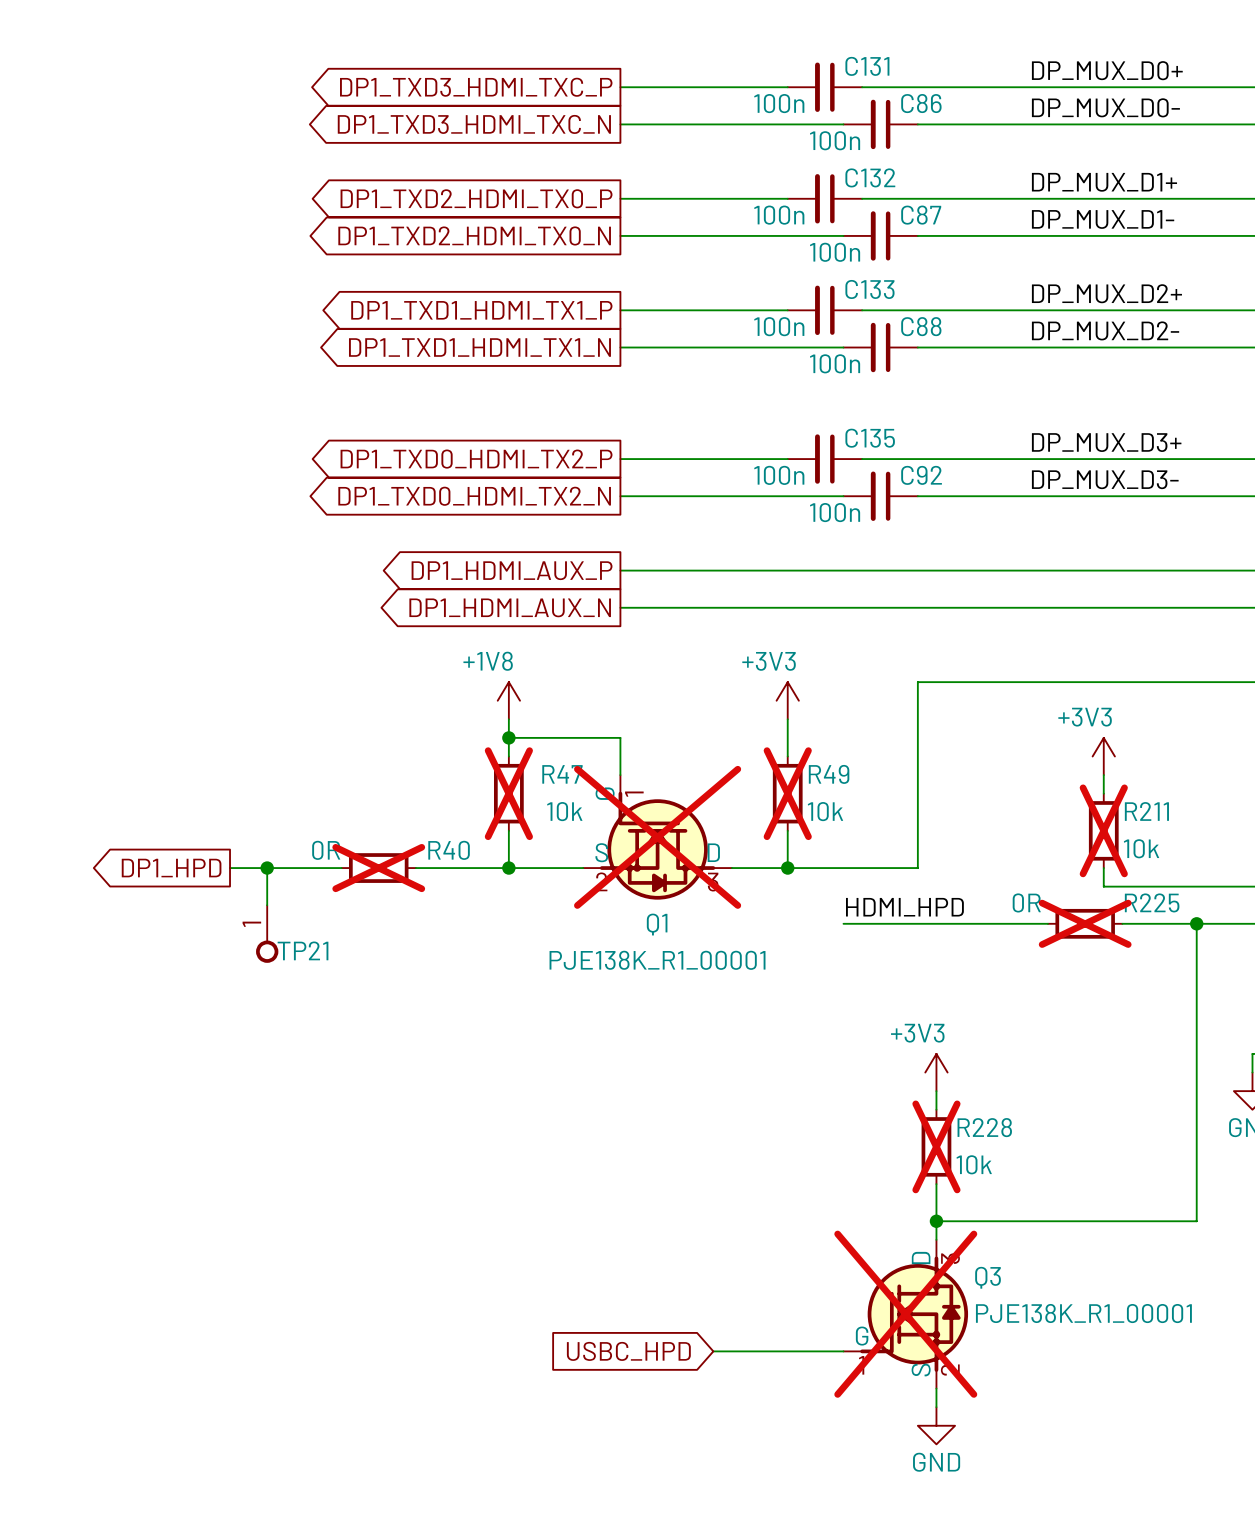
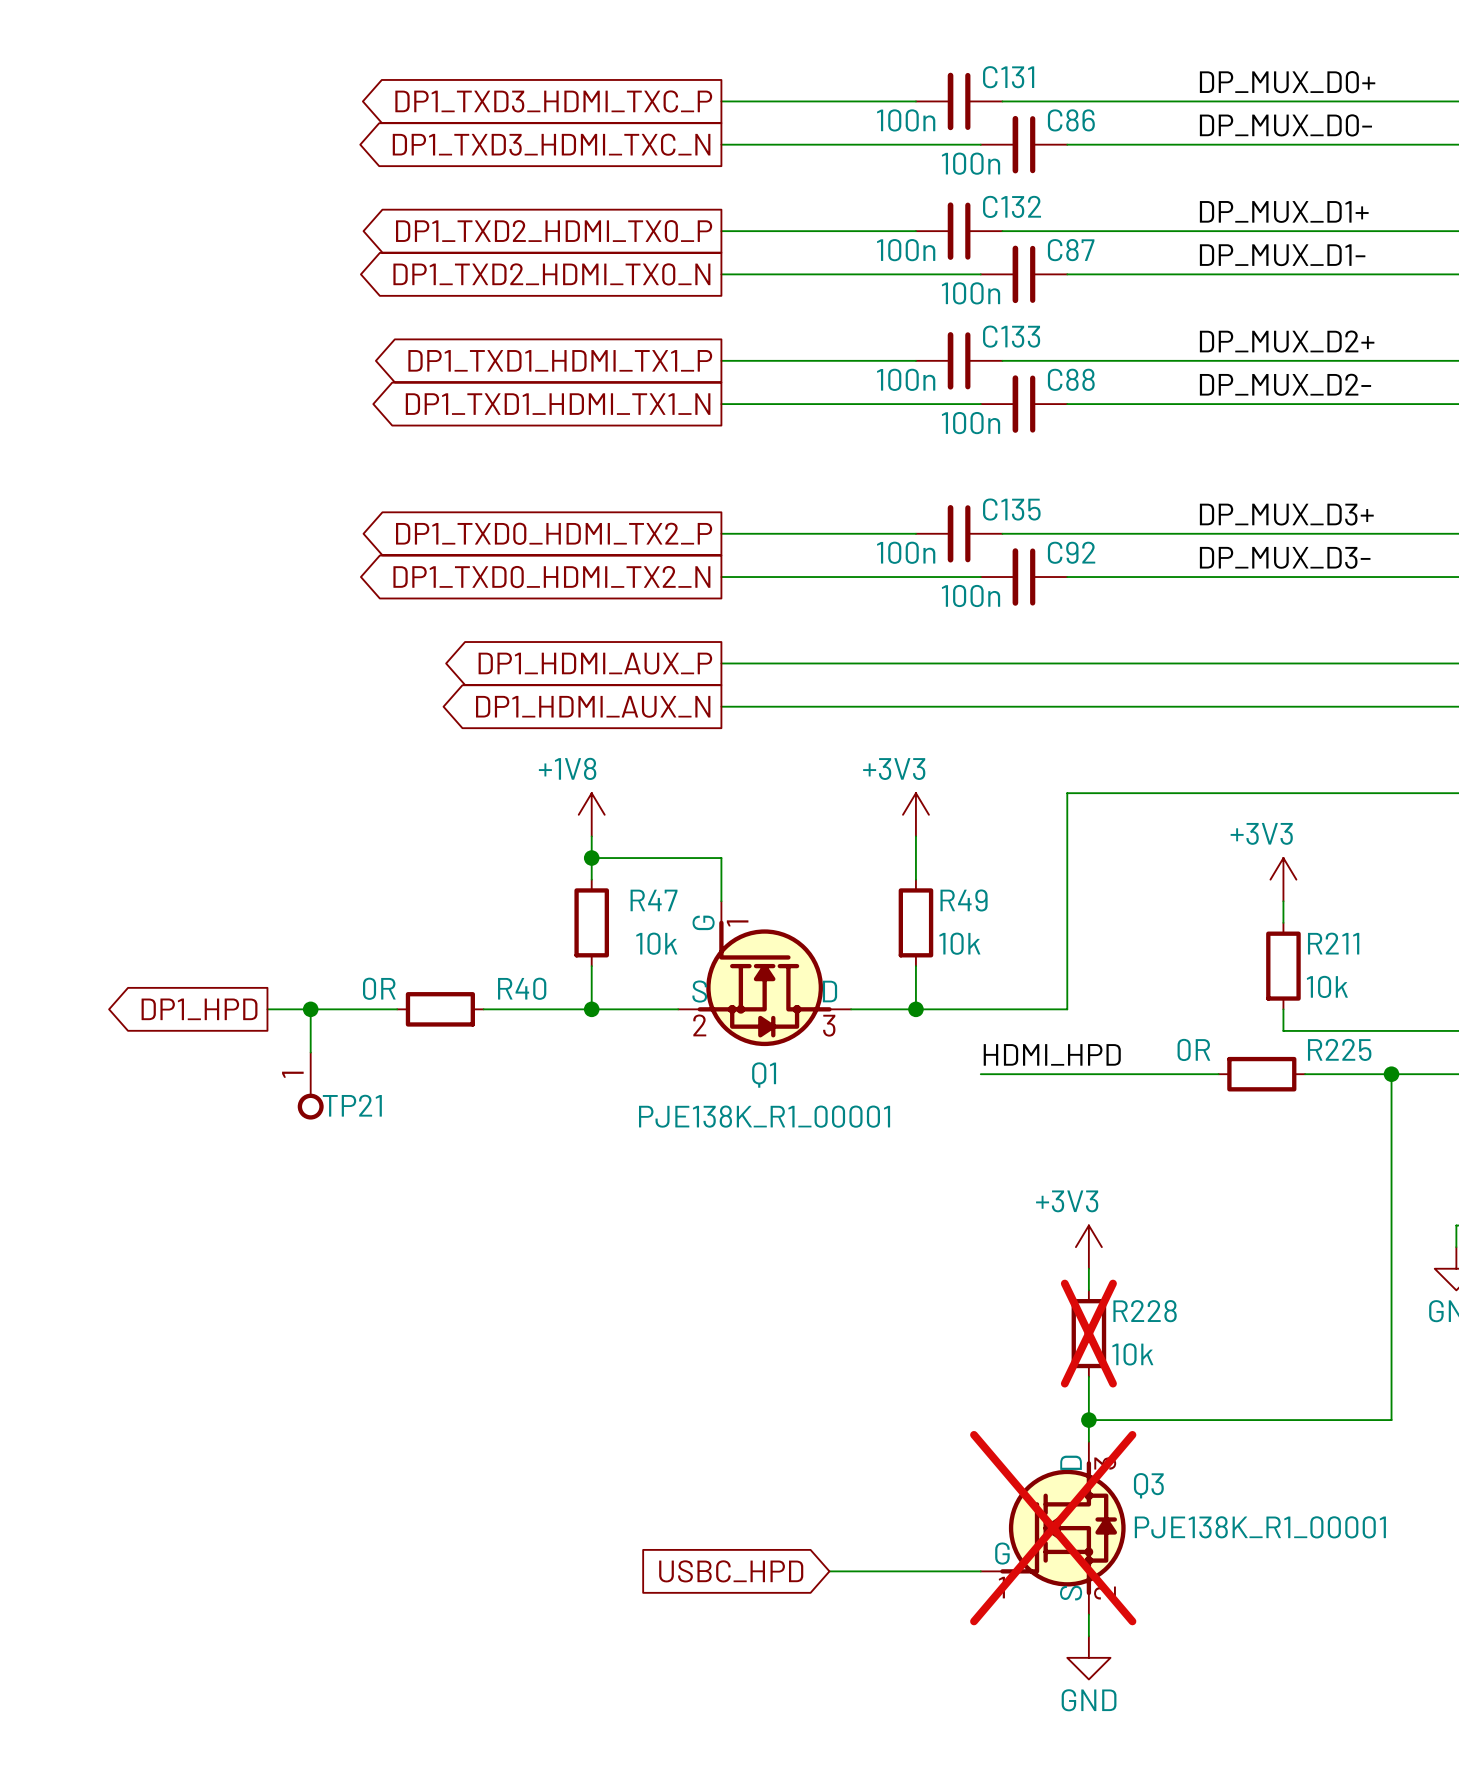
R47 do-not-place cross: (508, 793) -> none
R49 do-not-place cross: (787, 793) -> none
R211 do-not-place cross: (1103, 830) -> none
Q1 do-not-place cross: (657, 837) -> none
R40 do-not-place cross: (378, 868) -> none
R225 do-not-place cross: (1085, 923) -> none

